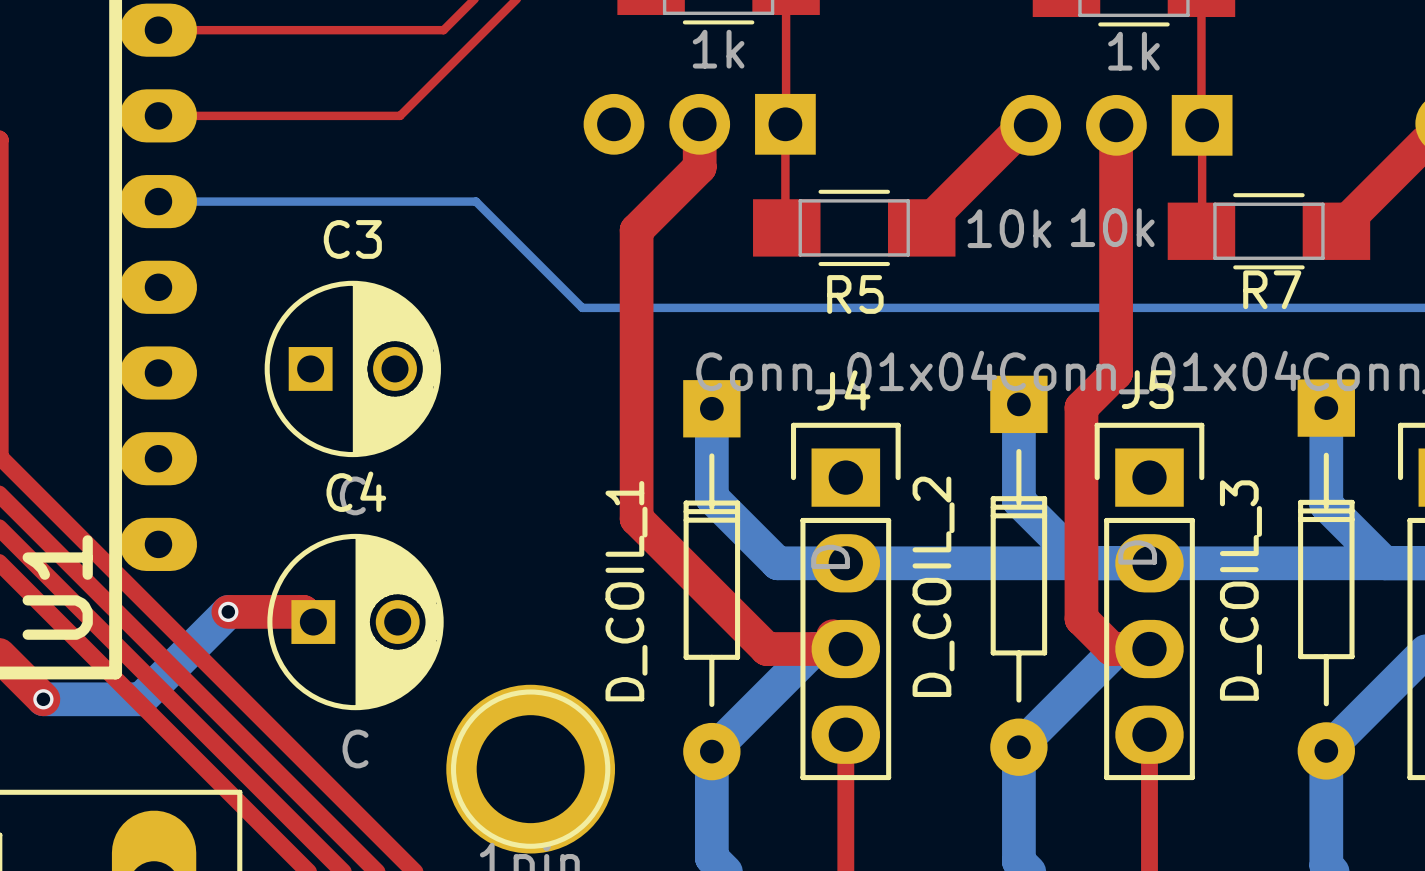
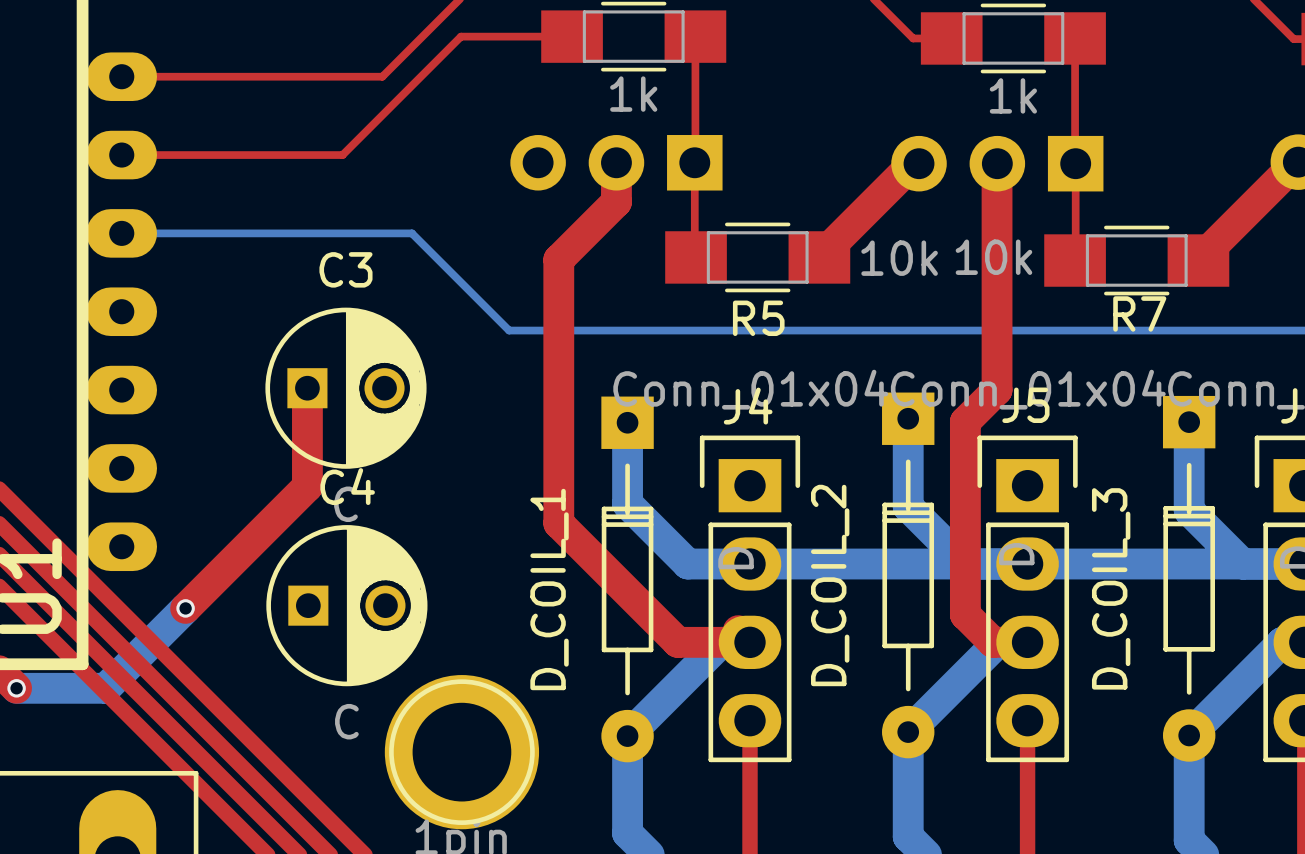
C3 position: (352, 368) -> (345, 388)
top track: (228, 611) (303, 611) (313, 622) -> (185, 608) (307, 486) (307, 388)
C4 position: (355, 622) -> (346, 605)

